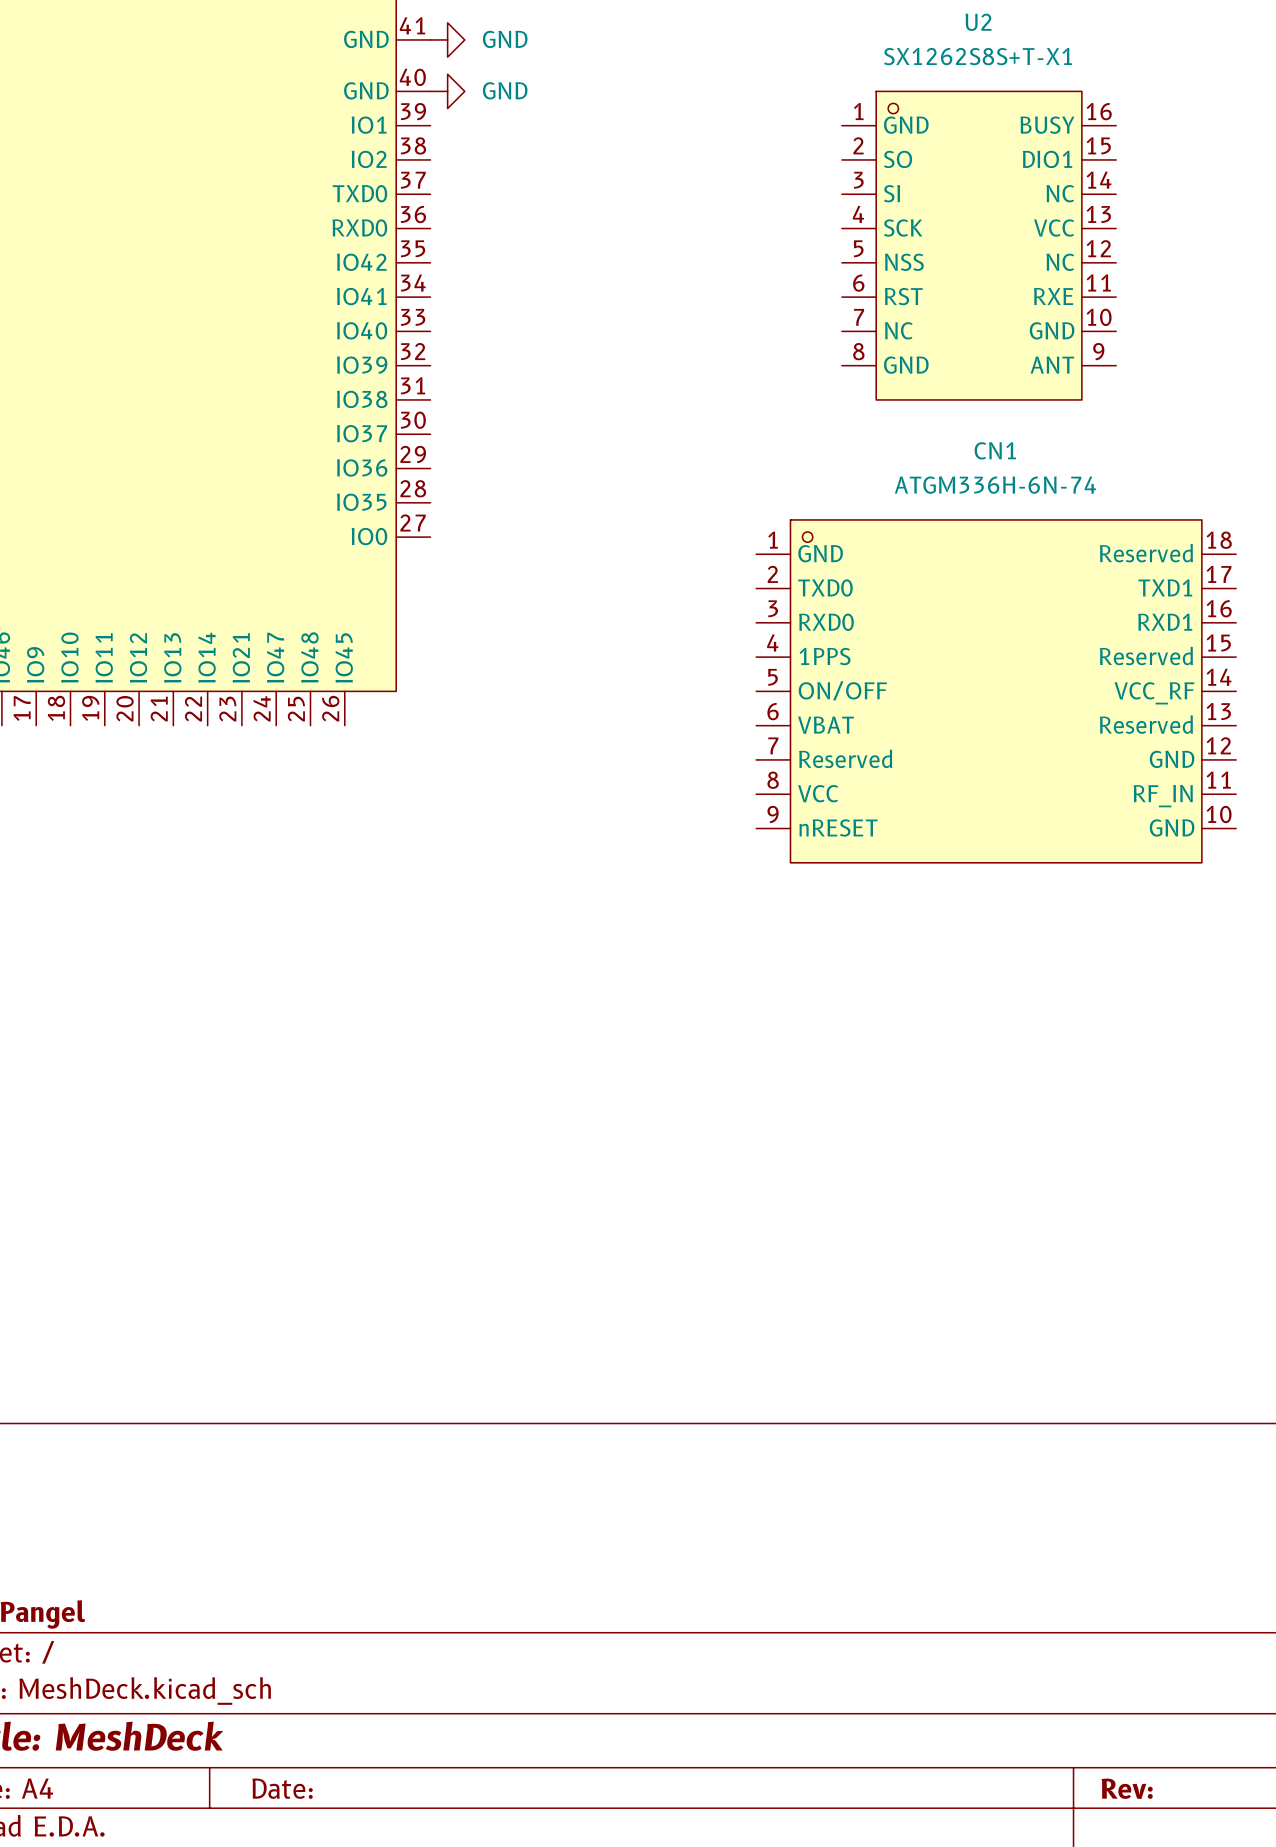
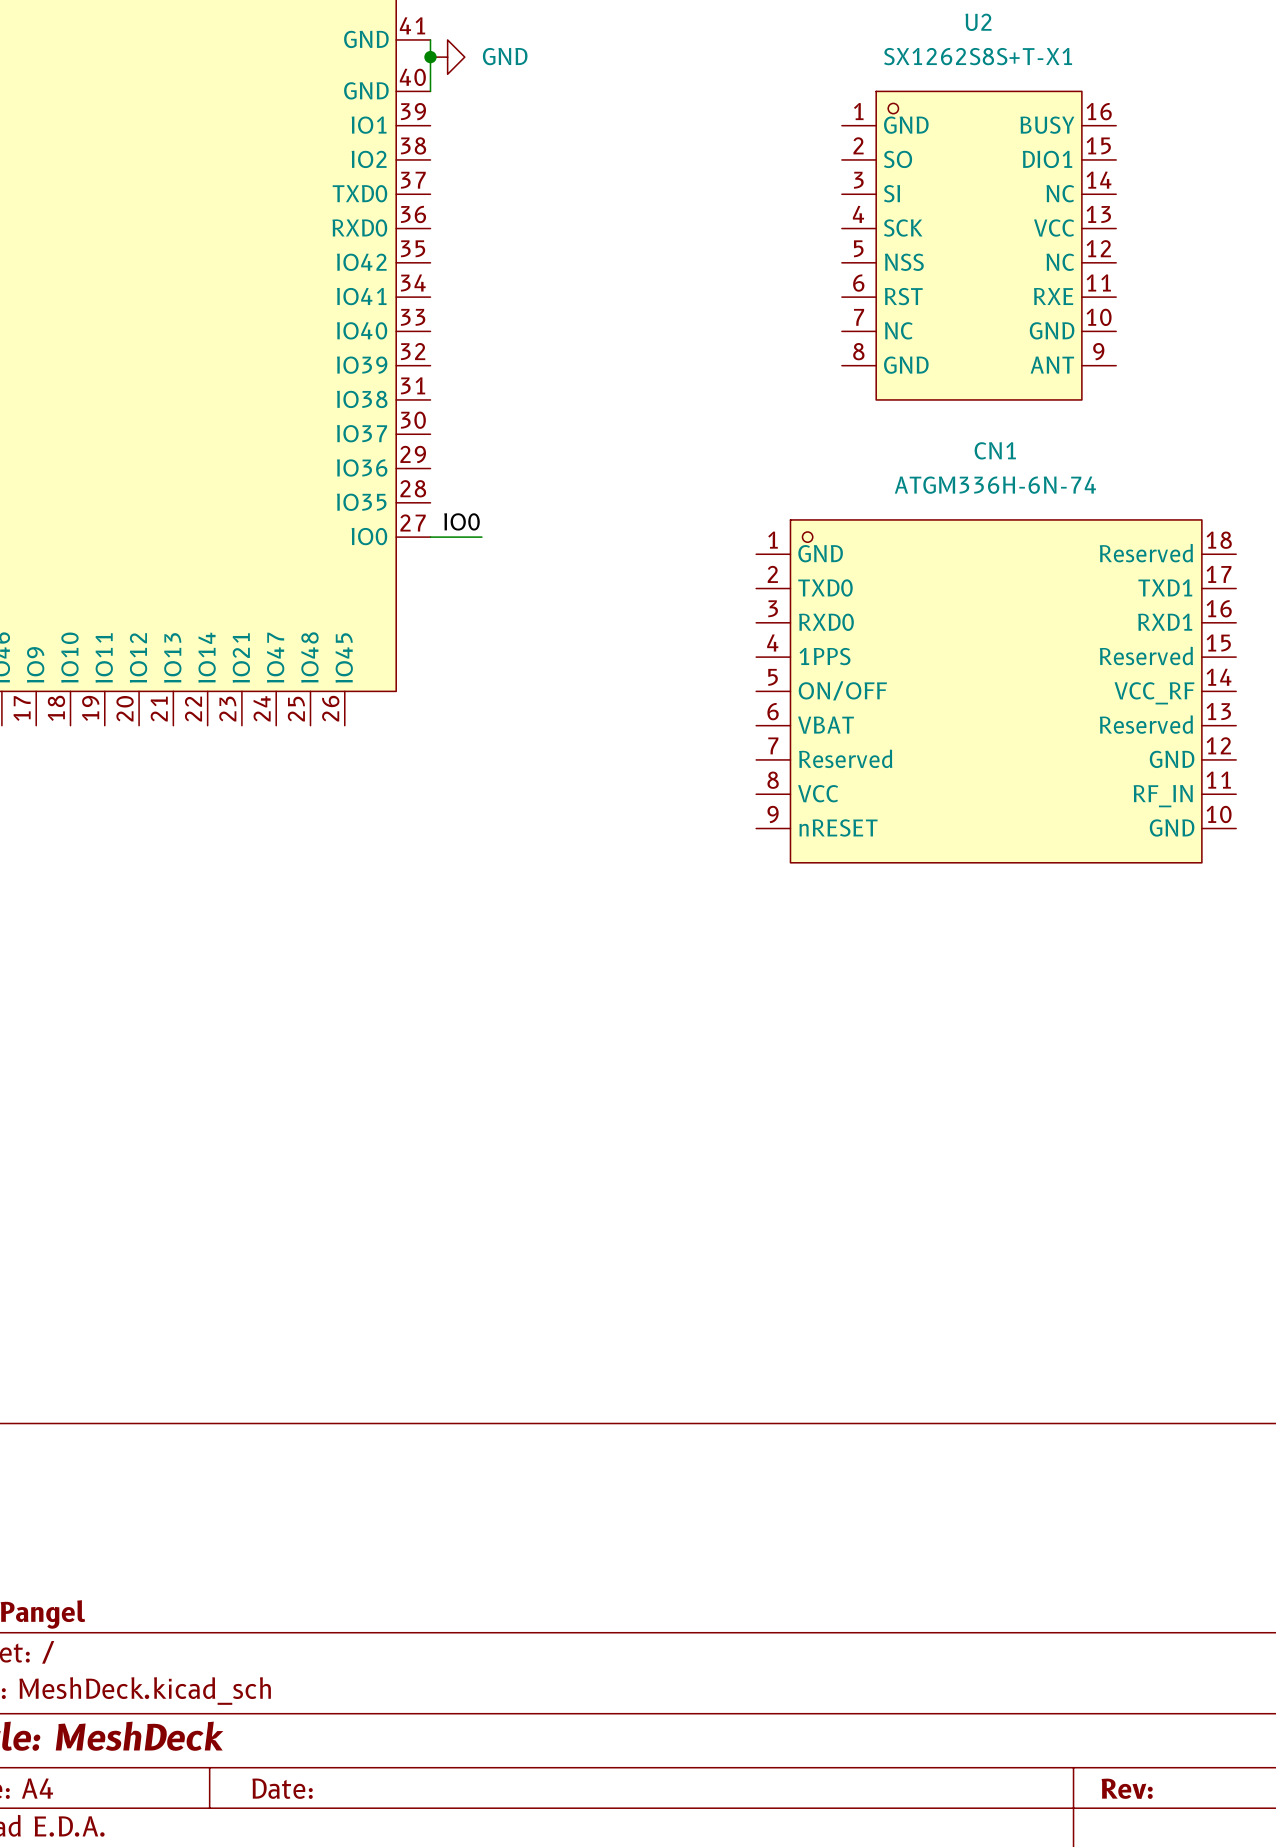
wire: none -> (430, 39) (430, 91)
power symbol: GND (447, 39) -> none
junction: none -> (430, 57)
power symbol: none -> GND (447, 57)
power symbol: GND (447, 91) -> none
label: none -> IO0 (462, 521)
wire: none -> (430, 537) (481, 537)

